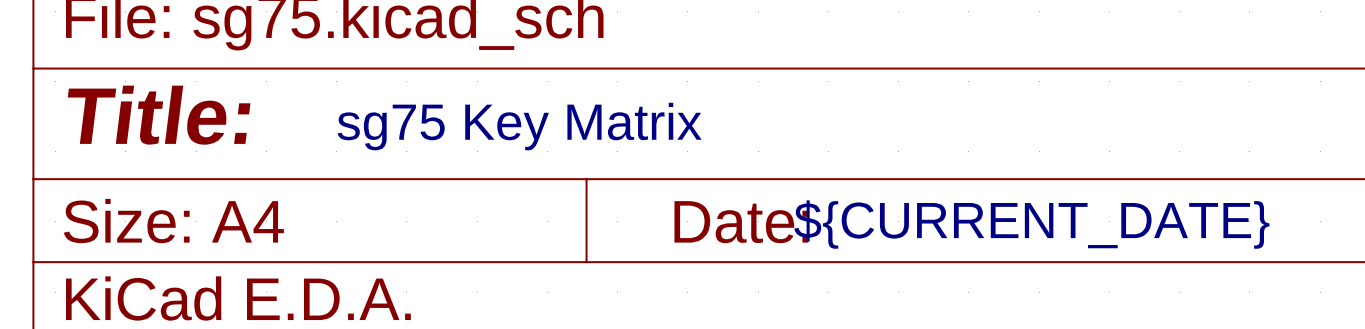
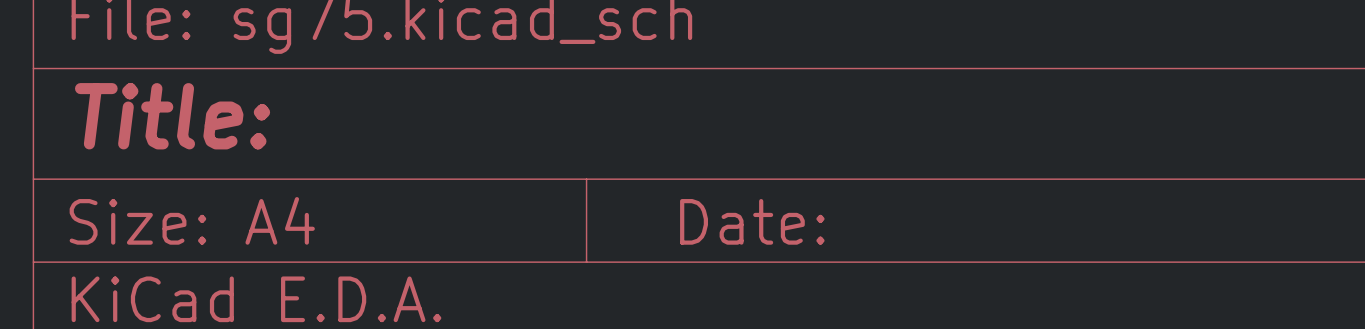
text: sg75 Key Matrix (519, 126) -> none
text: ${CURRENT_DATE} (1031, 224) -> none

